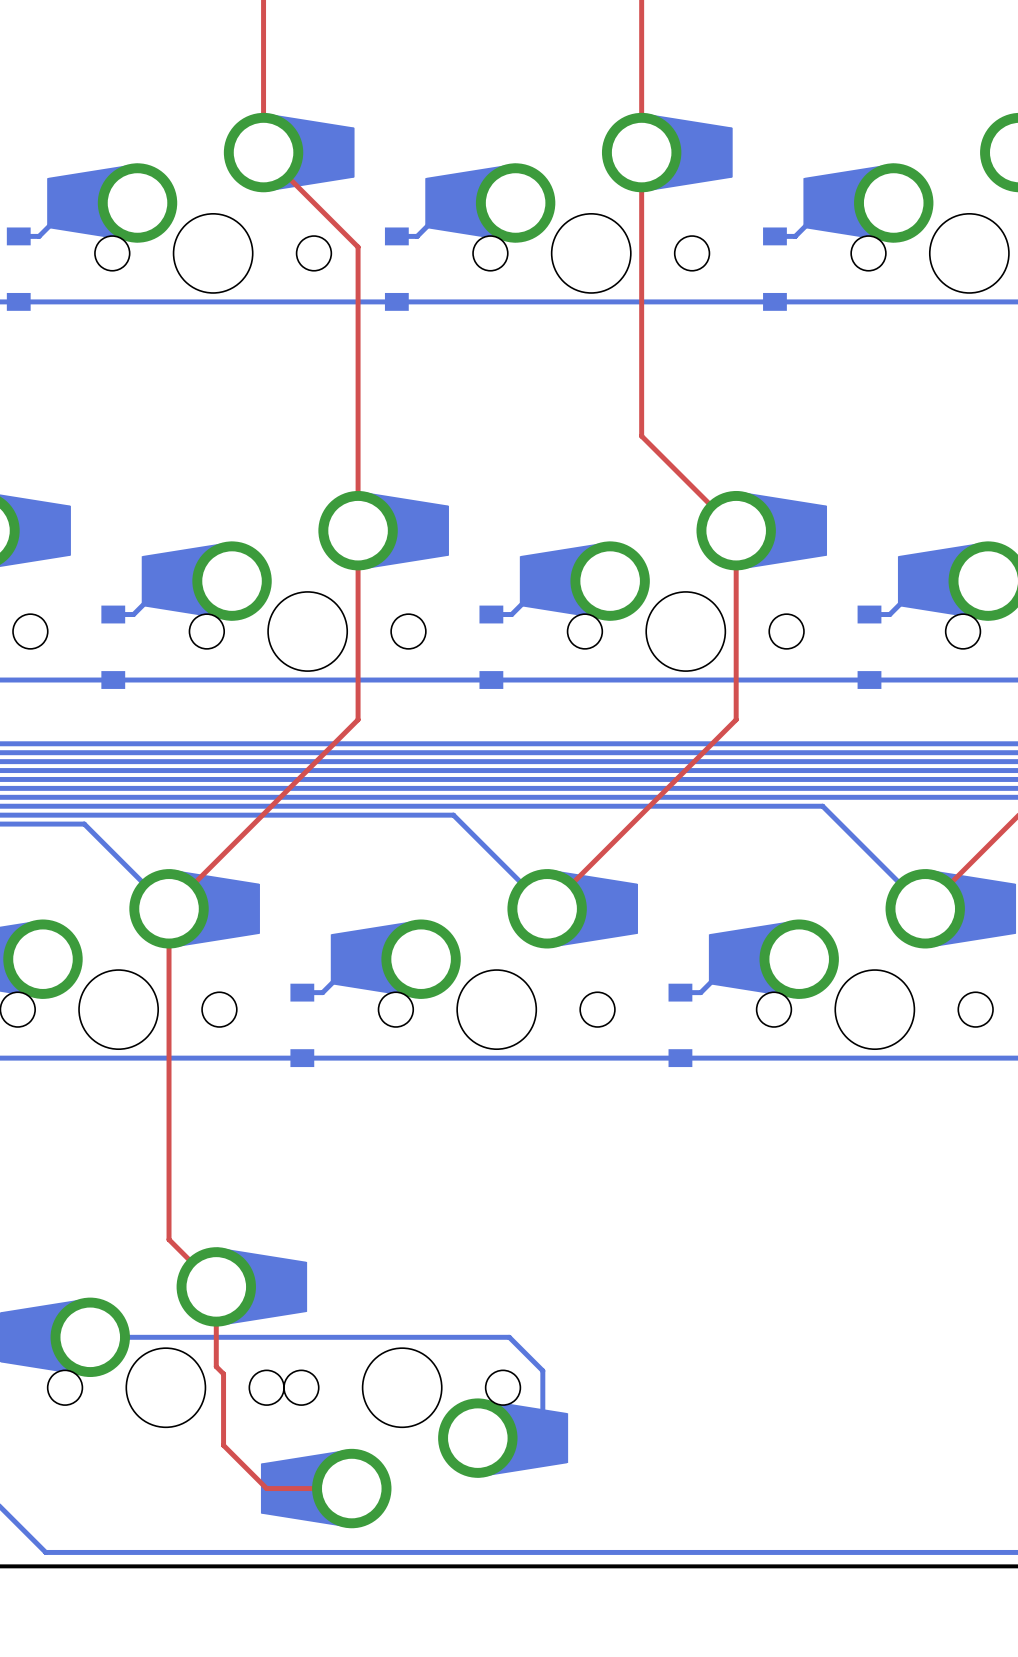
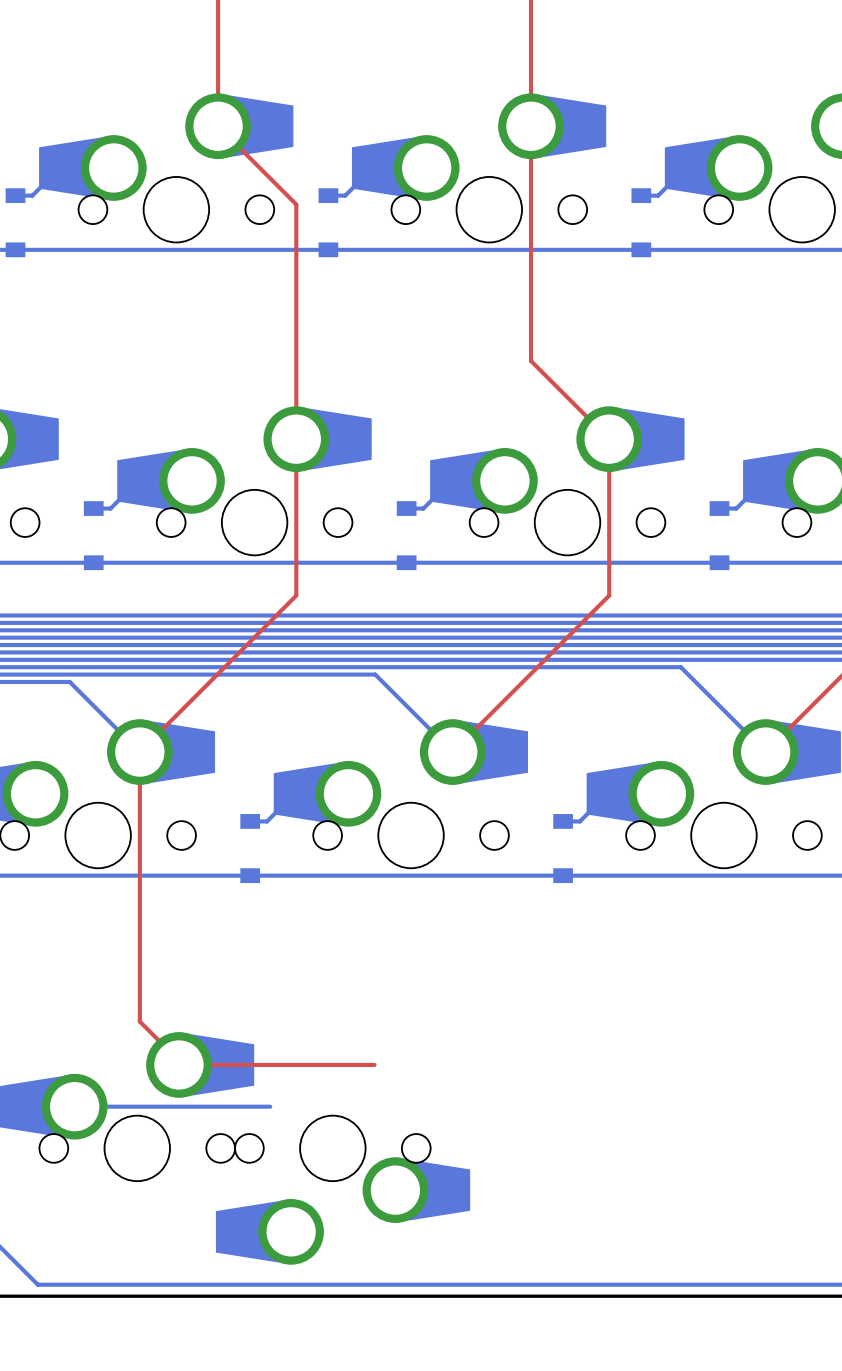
top track: (169, 1234) (169, 1239) (216, 1286) (216, 1366) (223, 1373) (223, 1445) (266, 1488) (351, 1488) -> (139, 1021) (178, 1060) (178, 1064) (374, 1064)
bottom track: (326, 1337) (509, 1337) (542, 1370) (542, 1438) -> none

